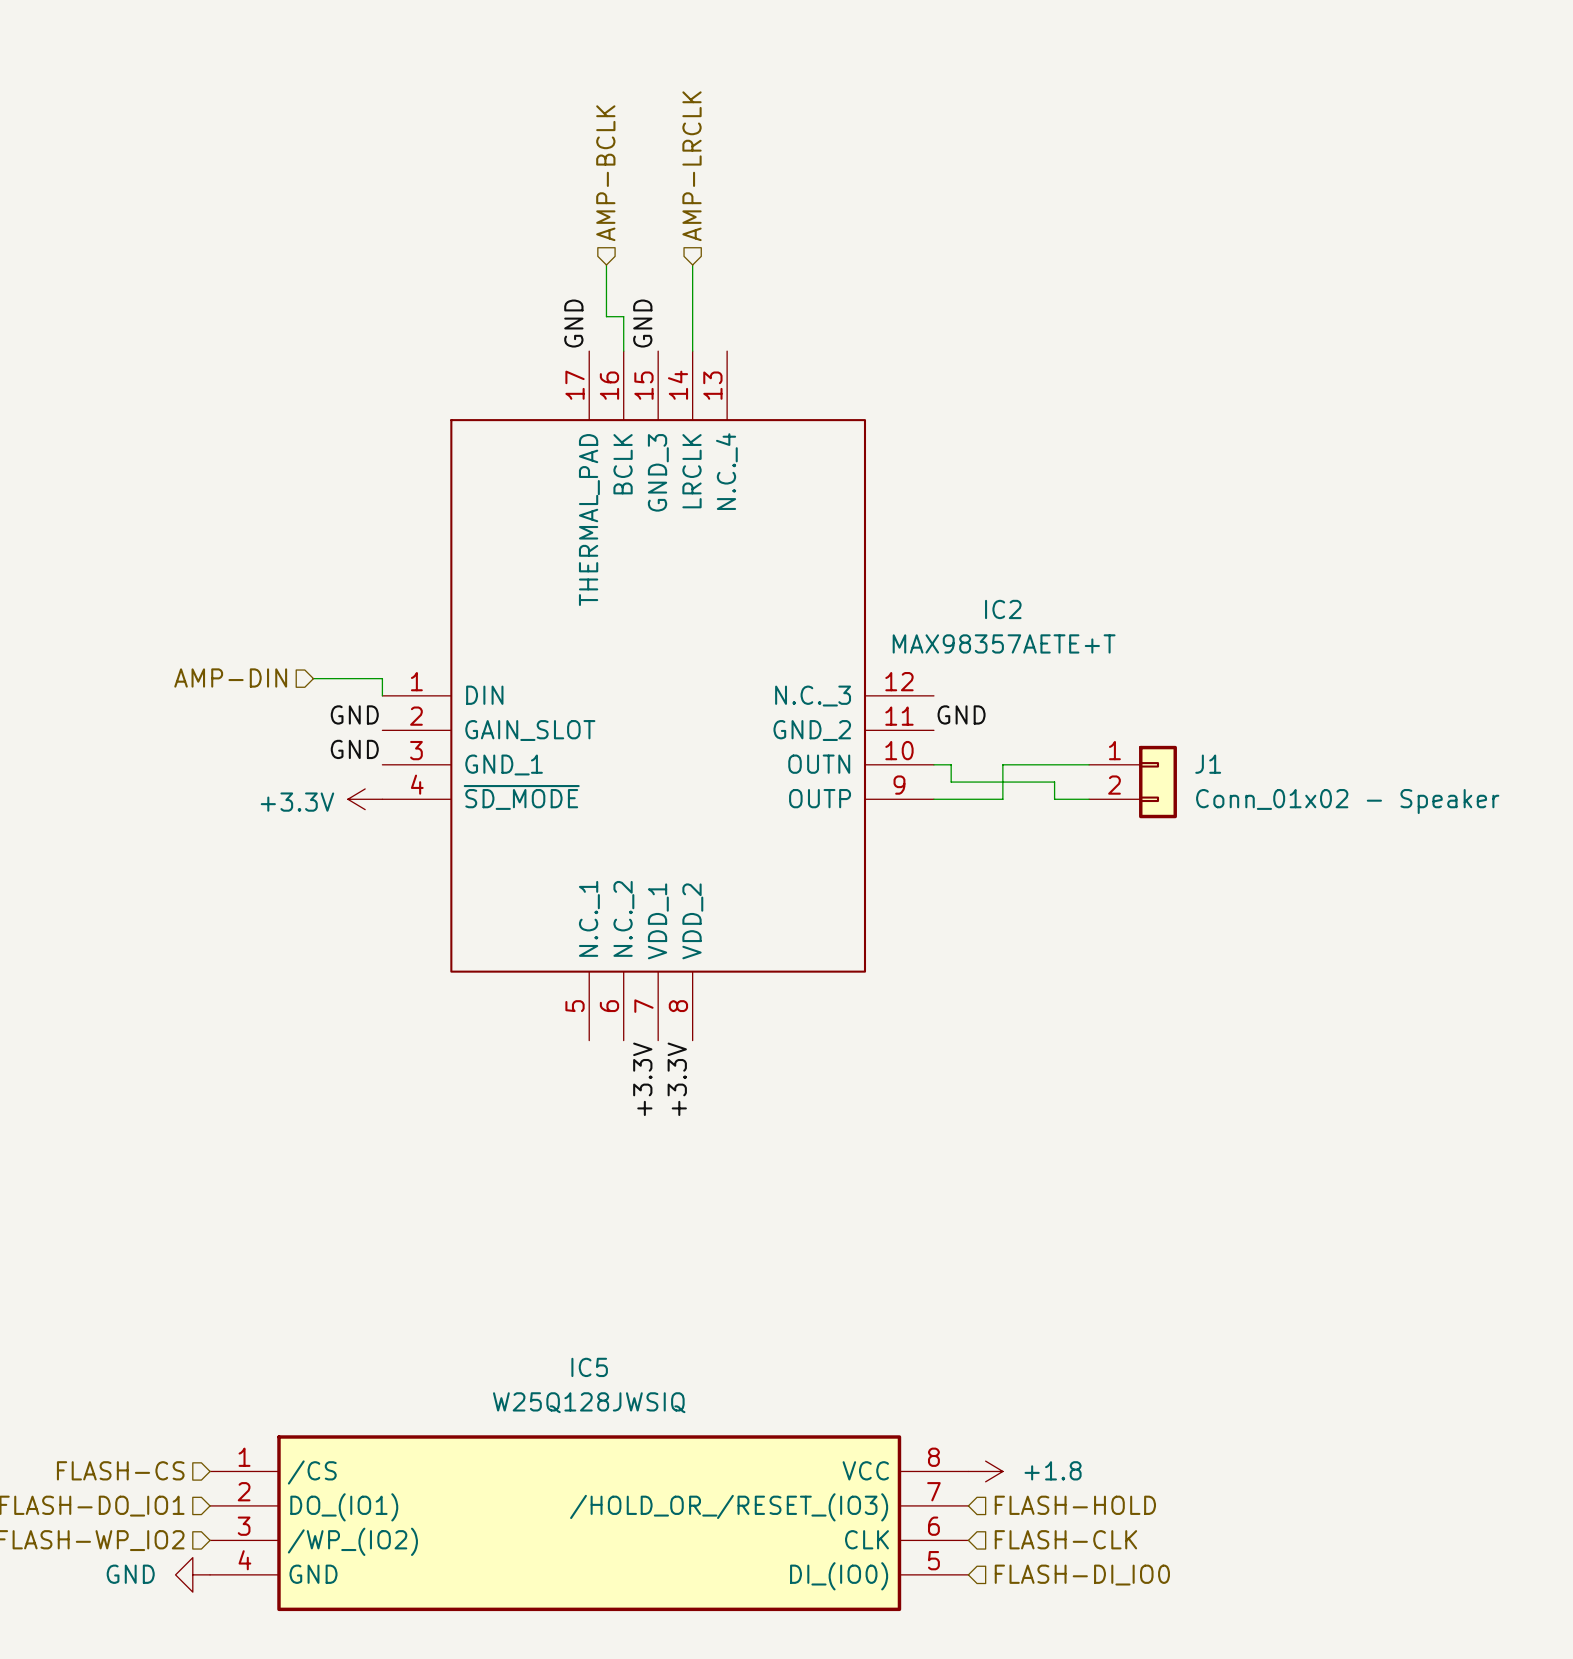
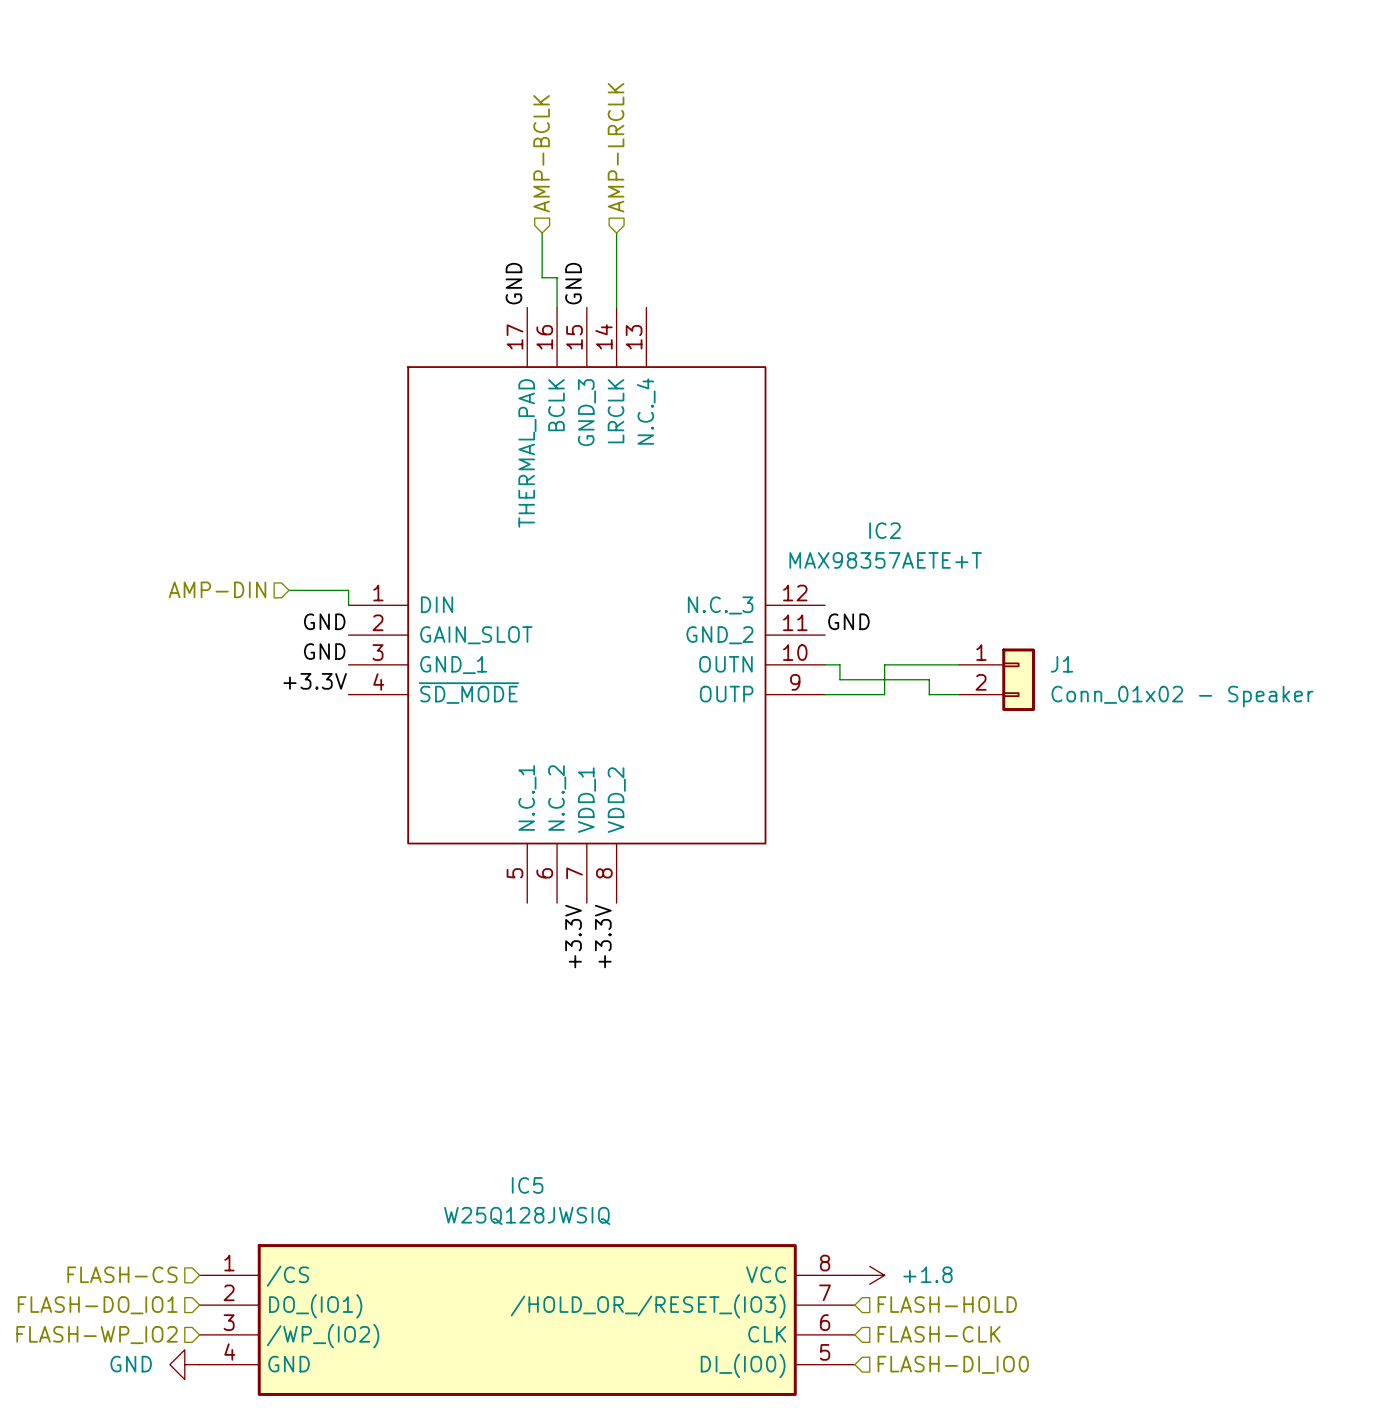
label: none -> +3.3V (315, 681)
power symbol: +3.3V (365, 799) -> none

